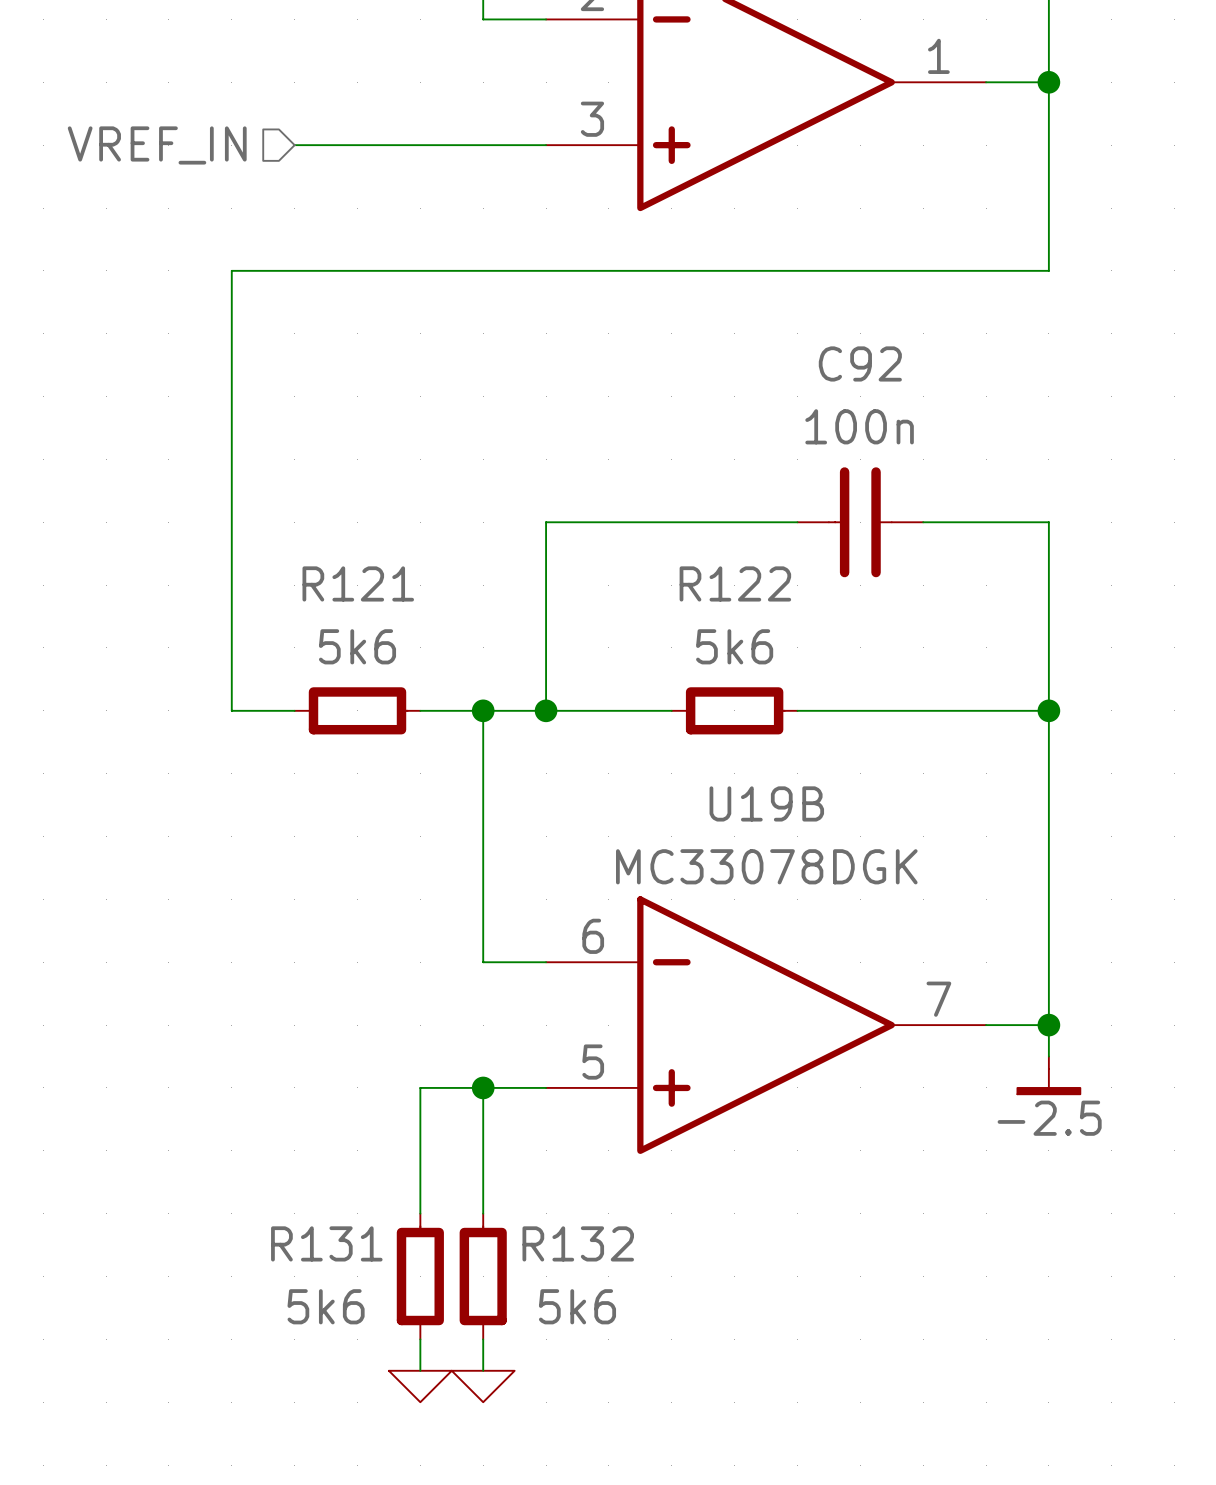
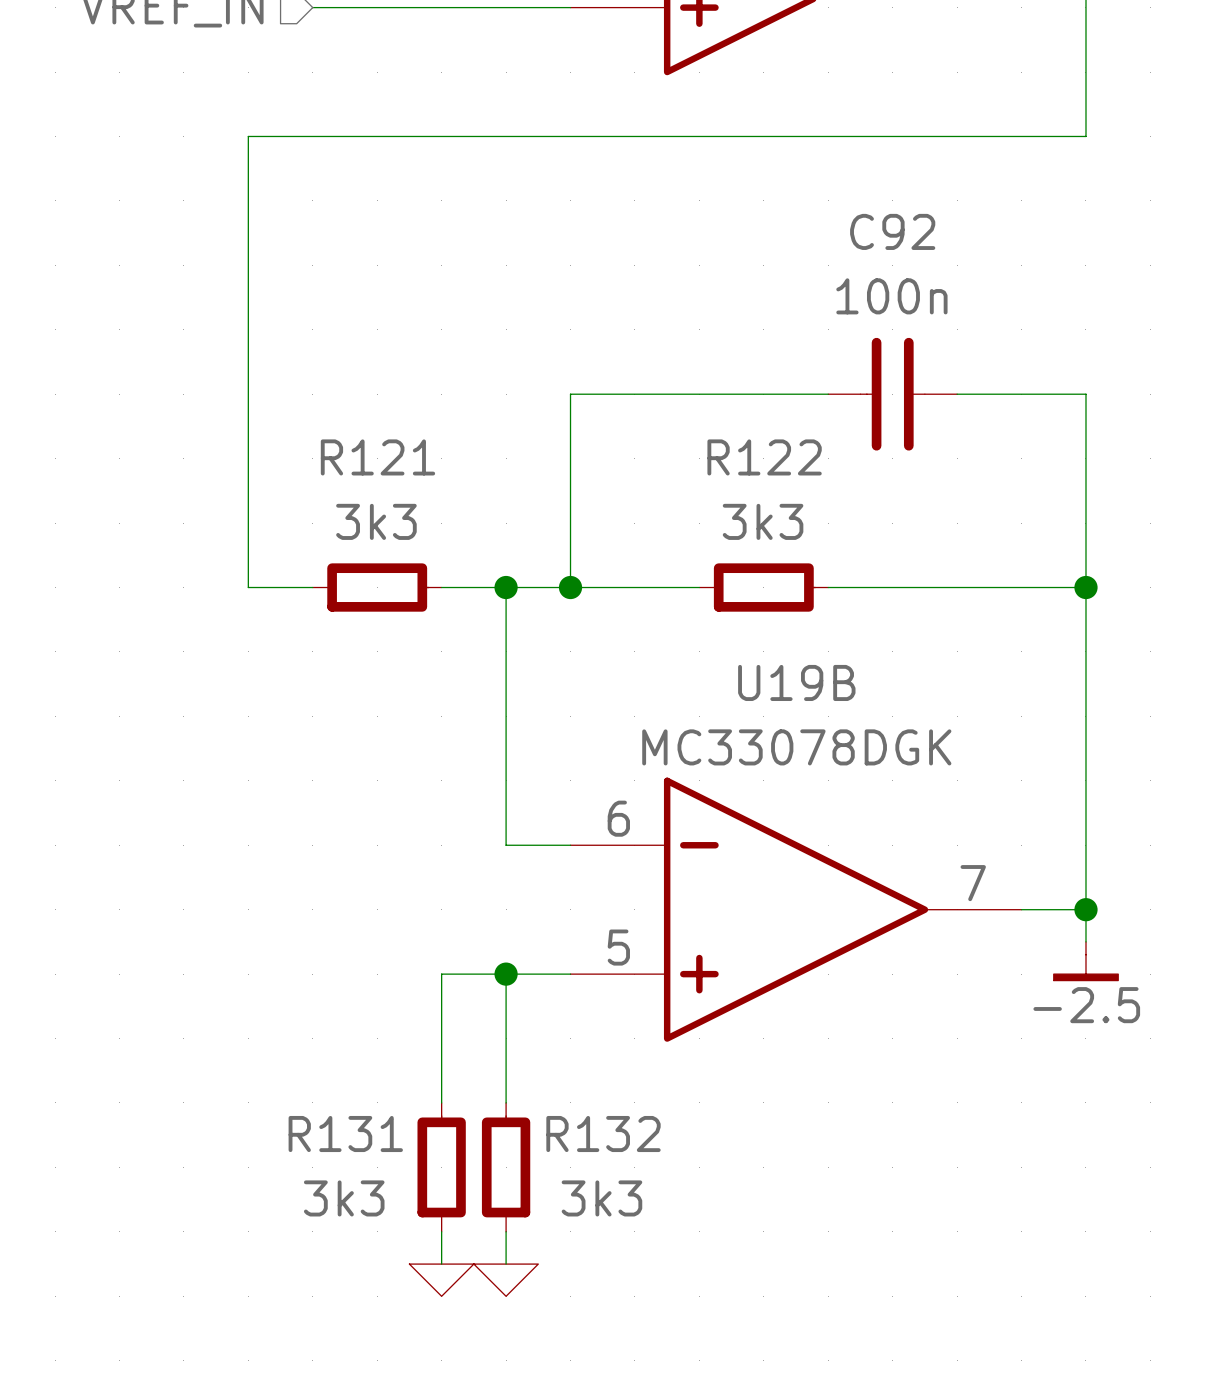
R121 value: 5k6 (357, 646) -> 3k3 (376, 521)
R122 value: 5k6 (734, 646) -> 3k3 (763, 521)
R131 value: 5k6 (326, 1306) -> 3k3 (344, 1198)
R132 value: 5k6 (577, 1306) -> 3k3 (601, 1198)

